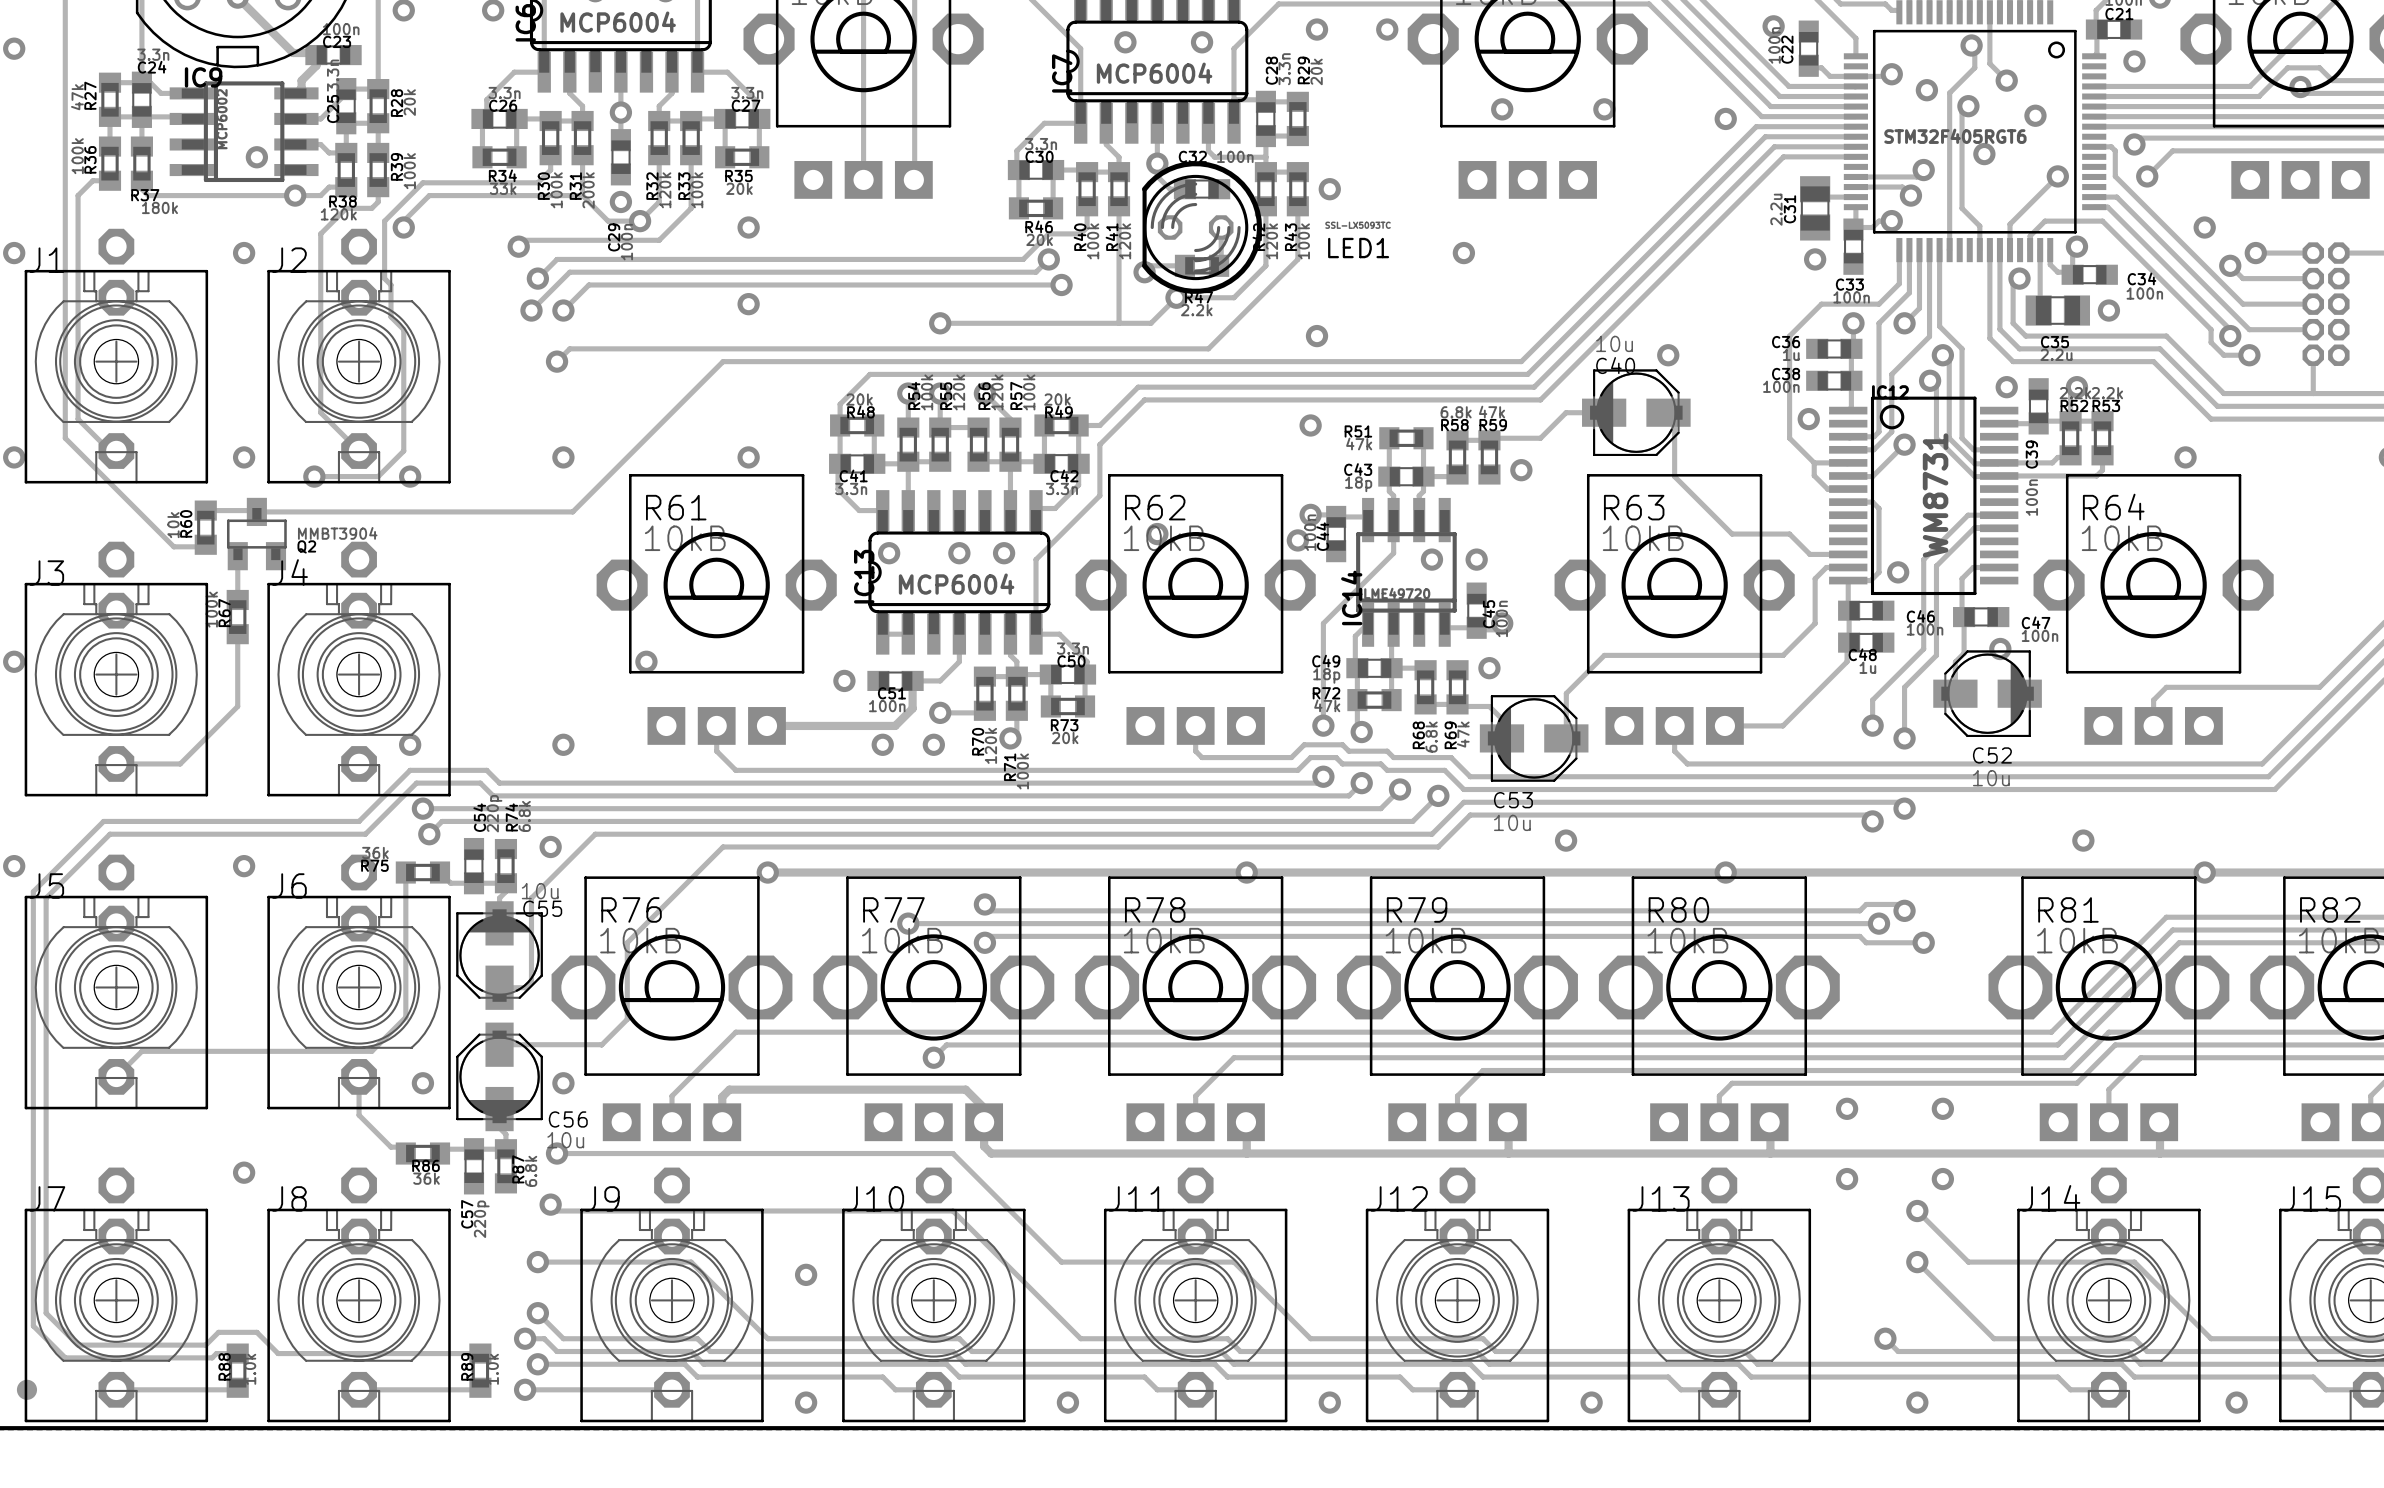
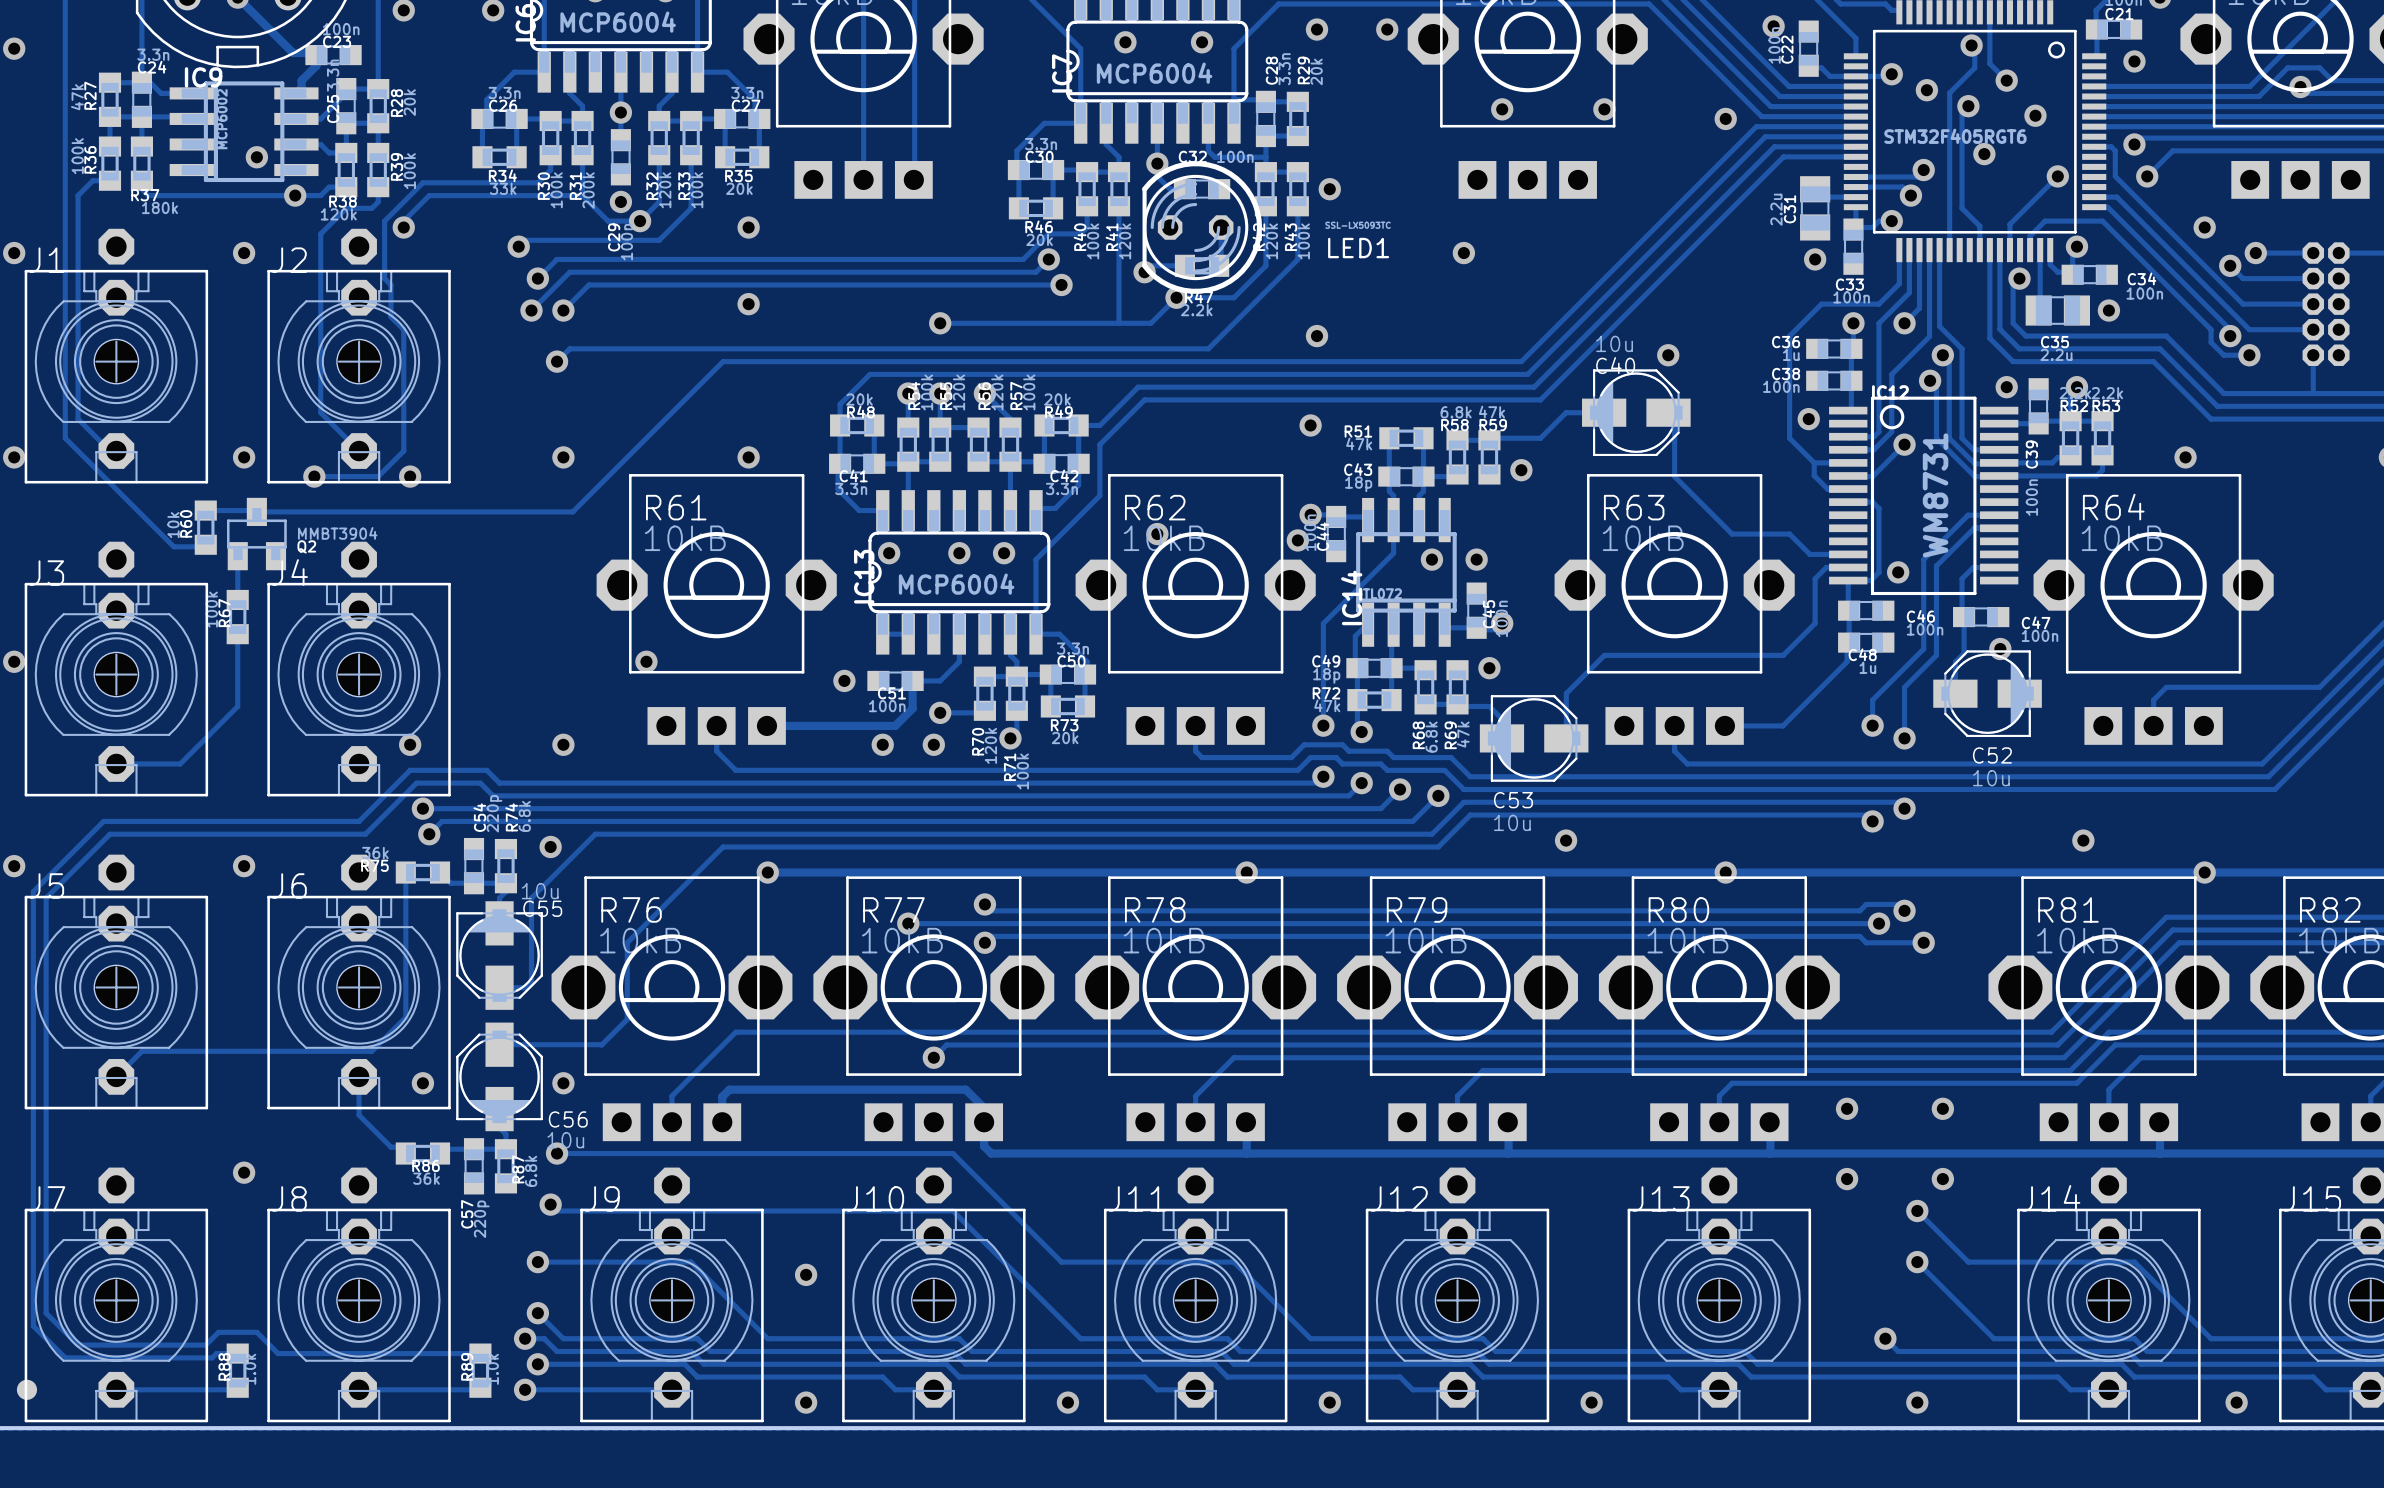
IC14 value: LME49720 (1397, 593) -> TL072 (1382, 593)

